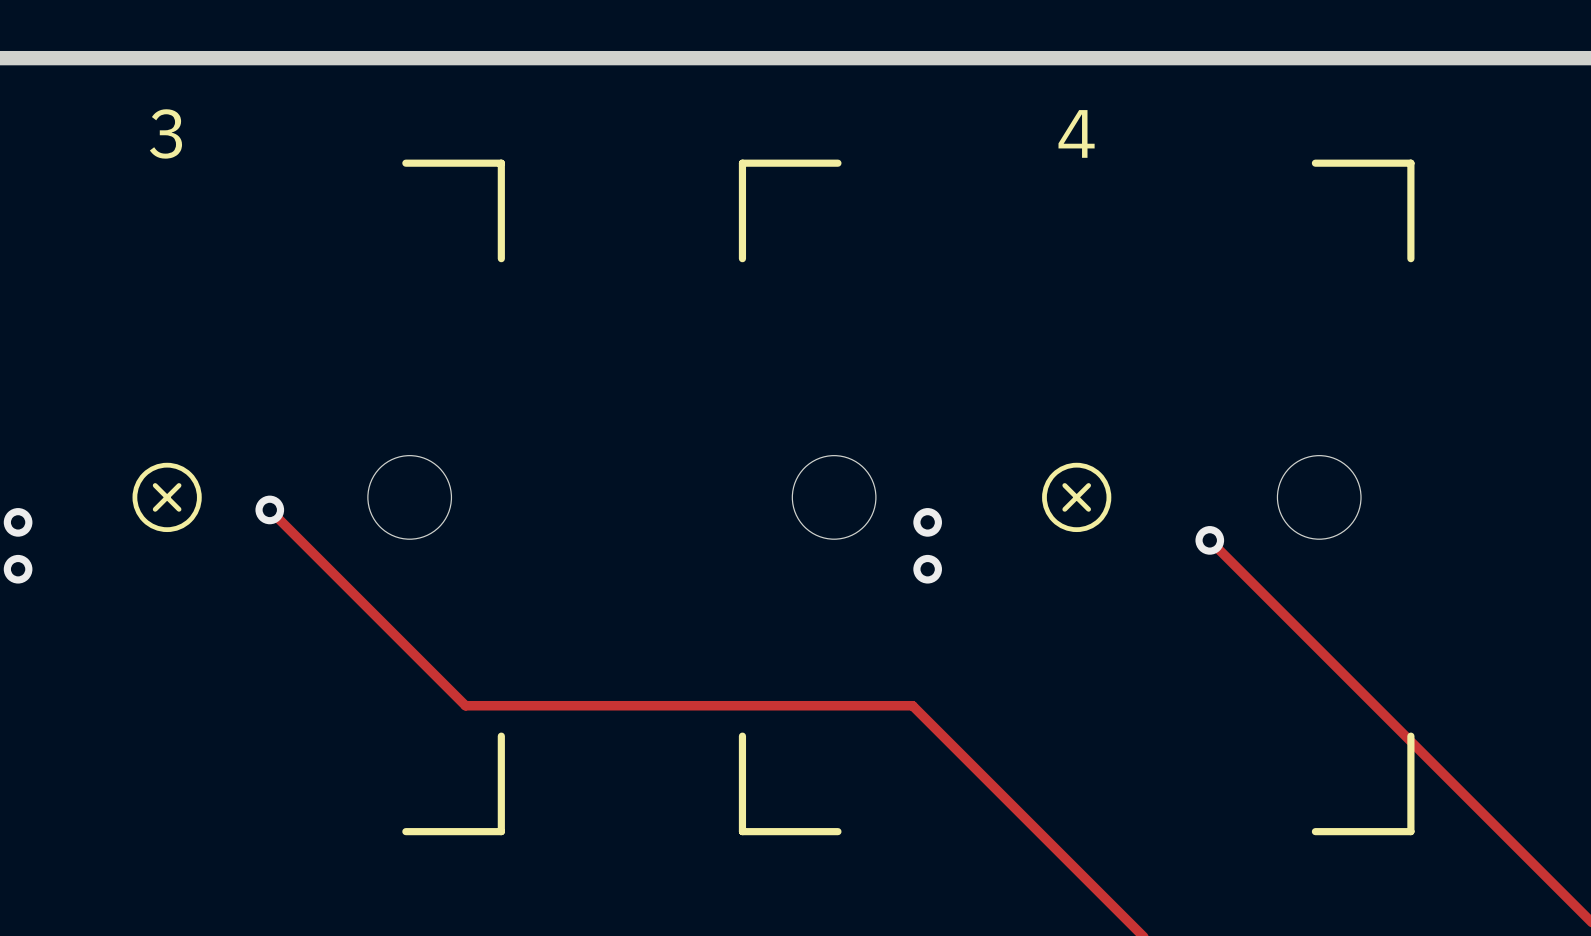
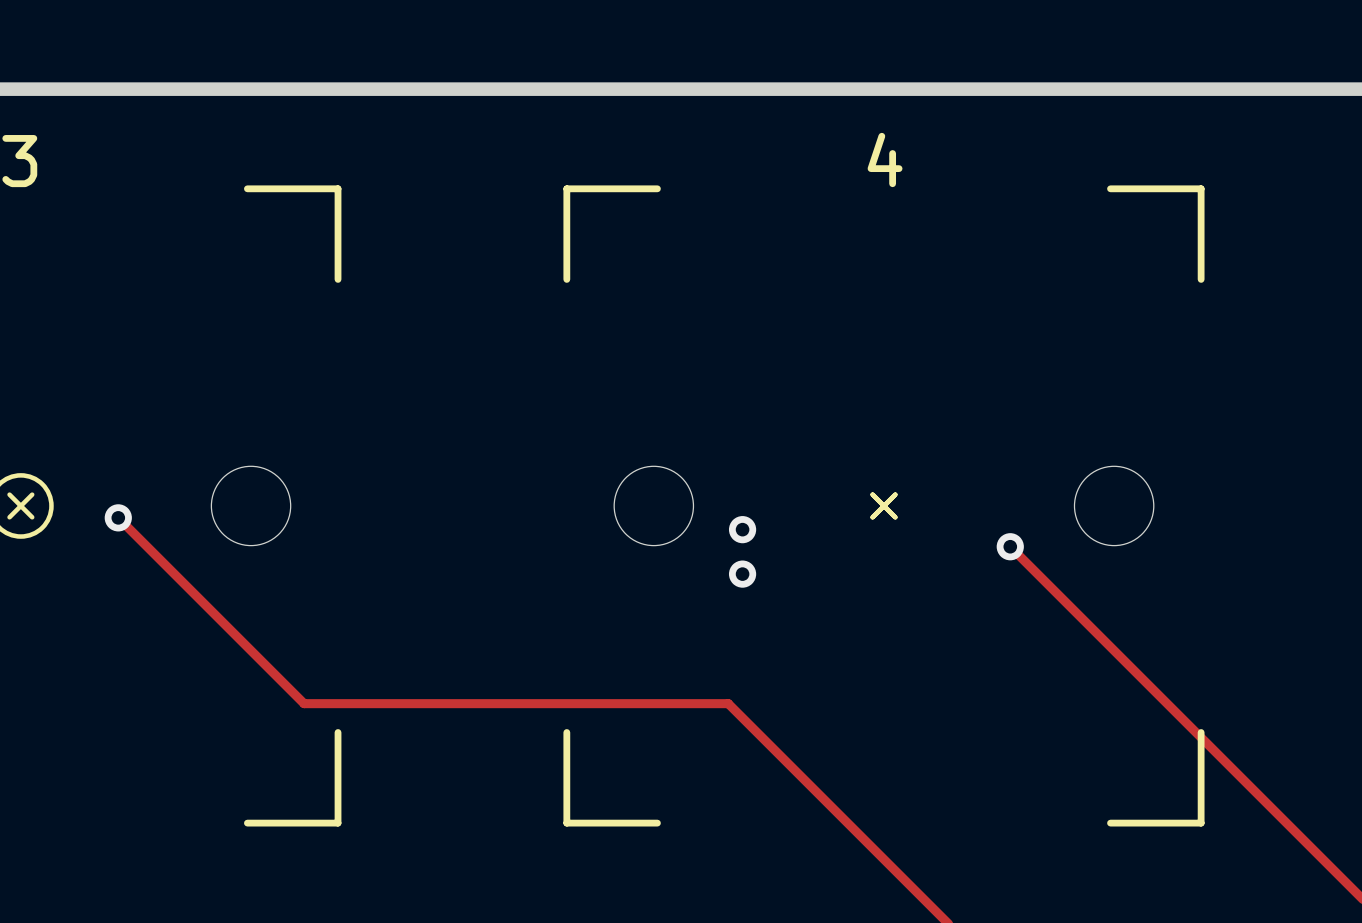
part footprint: [1042, 462, 1112, 533] -> [870, 492, 898, 520]

